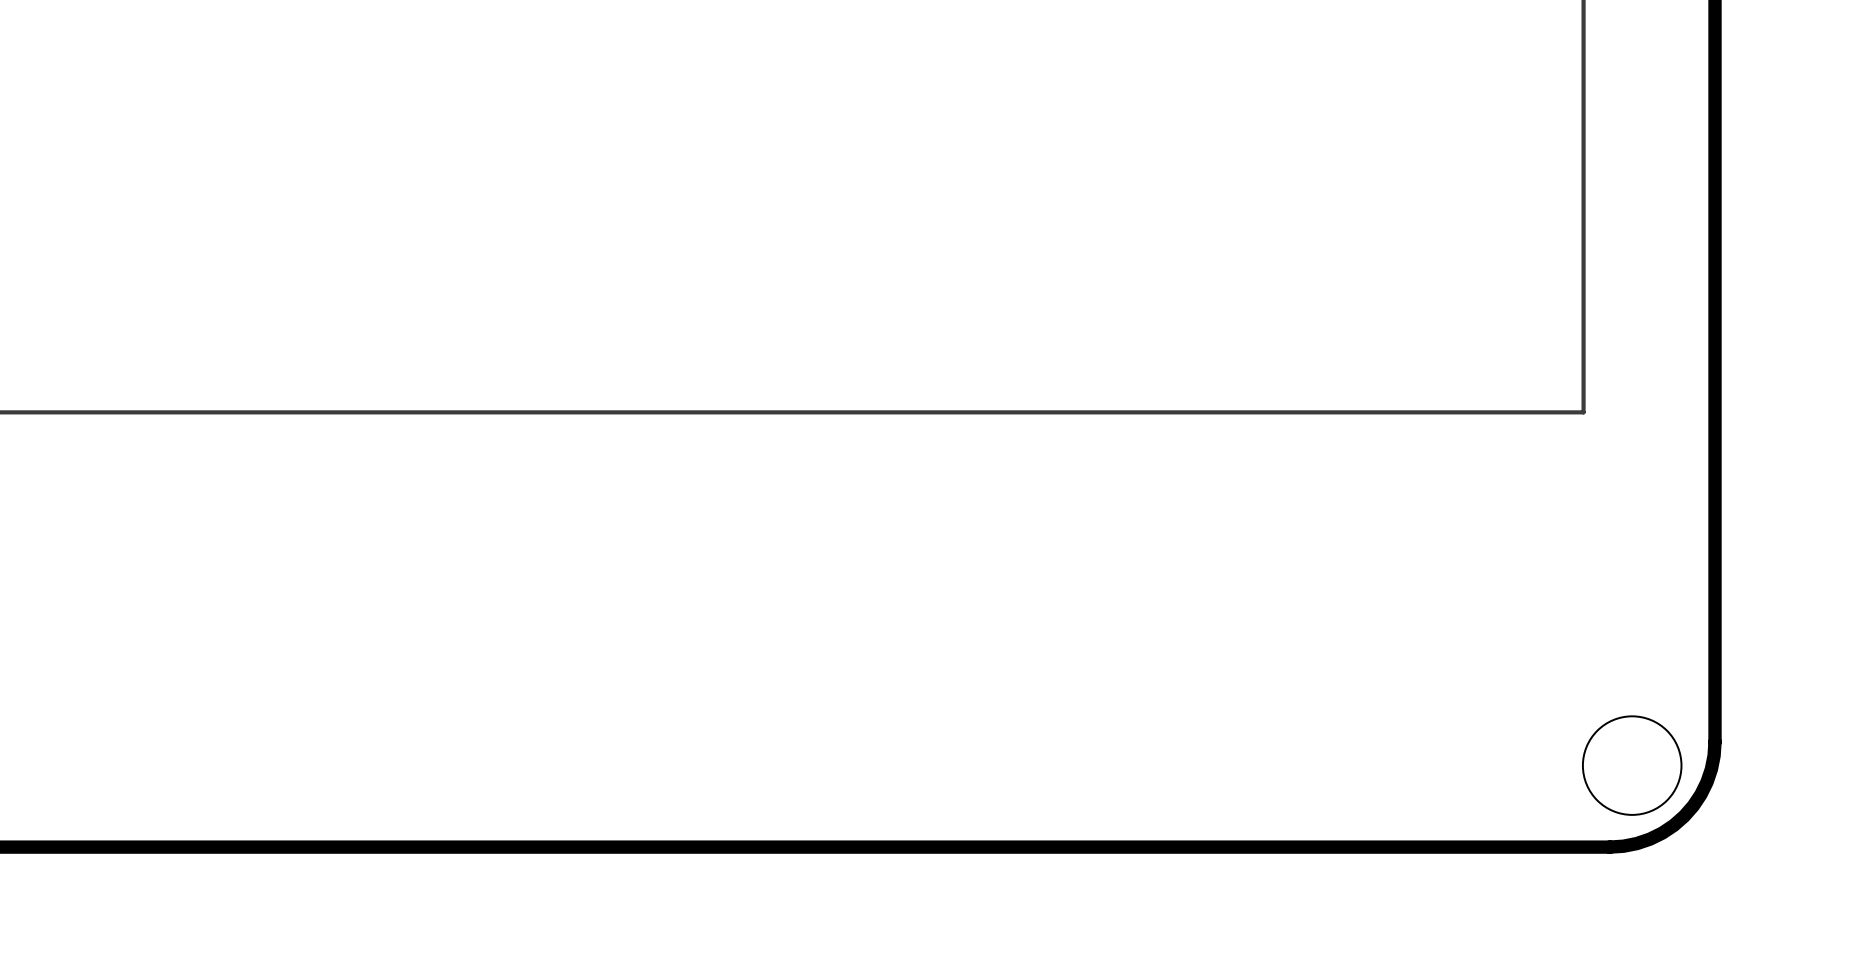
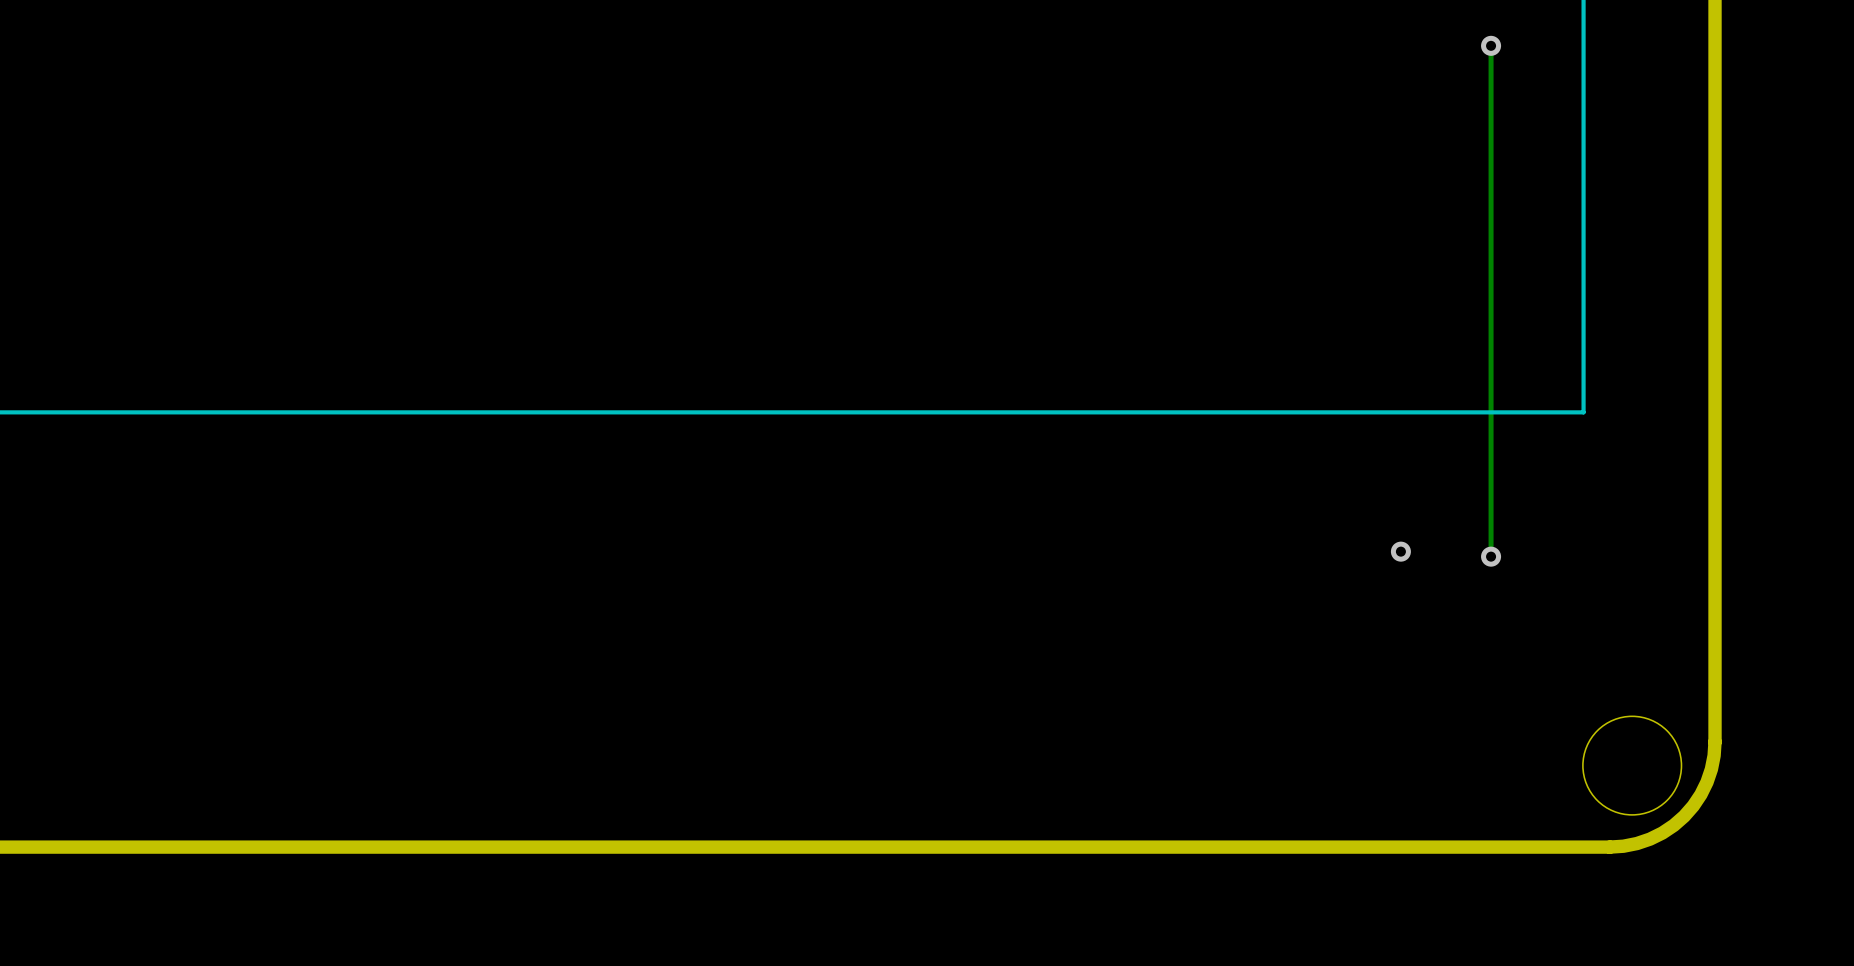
track: none -> (1491, 45) (1491, 556)
via: none -> (1491, 45)
via: none -> (1400, 551)
via: none -> (1491, 556)

